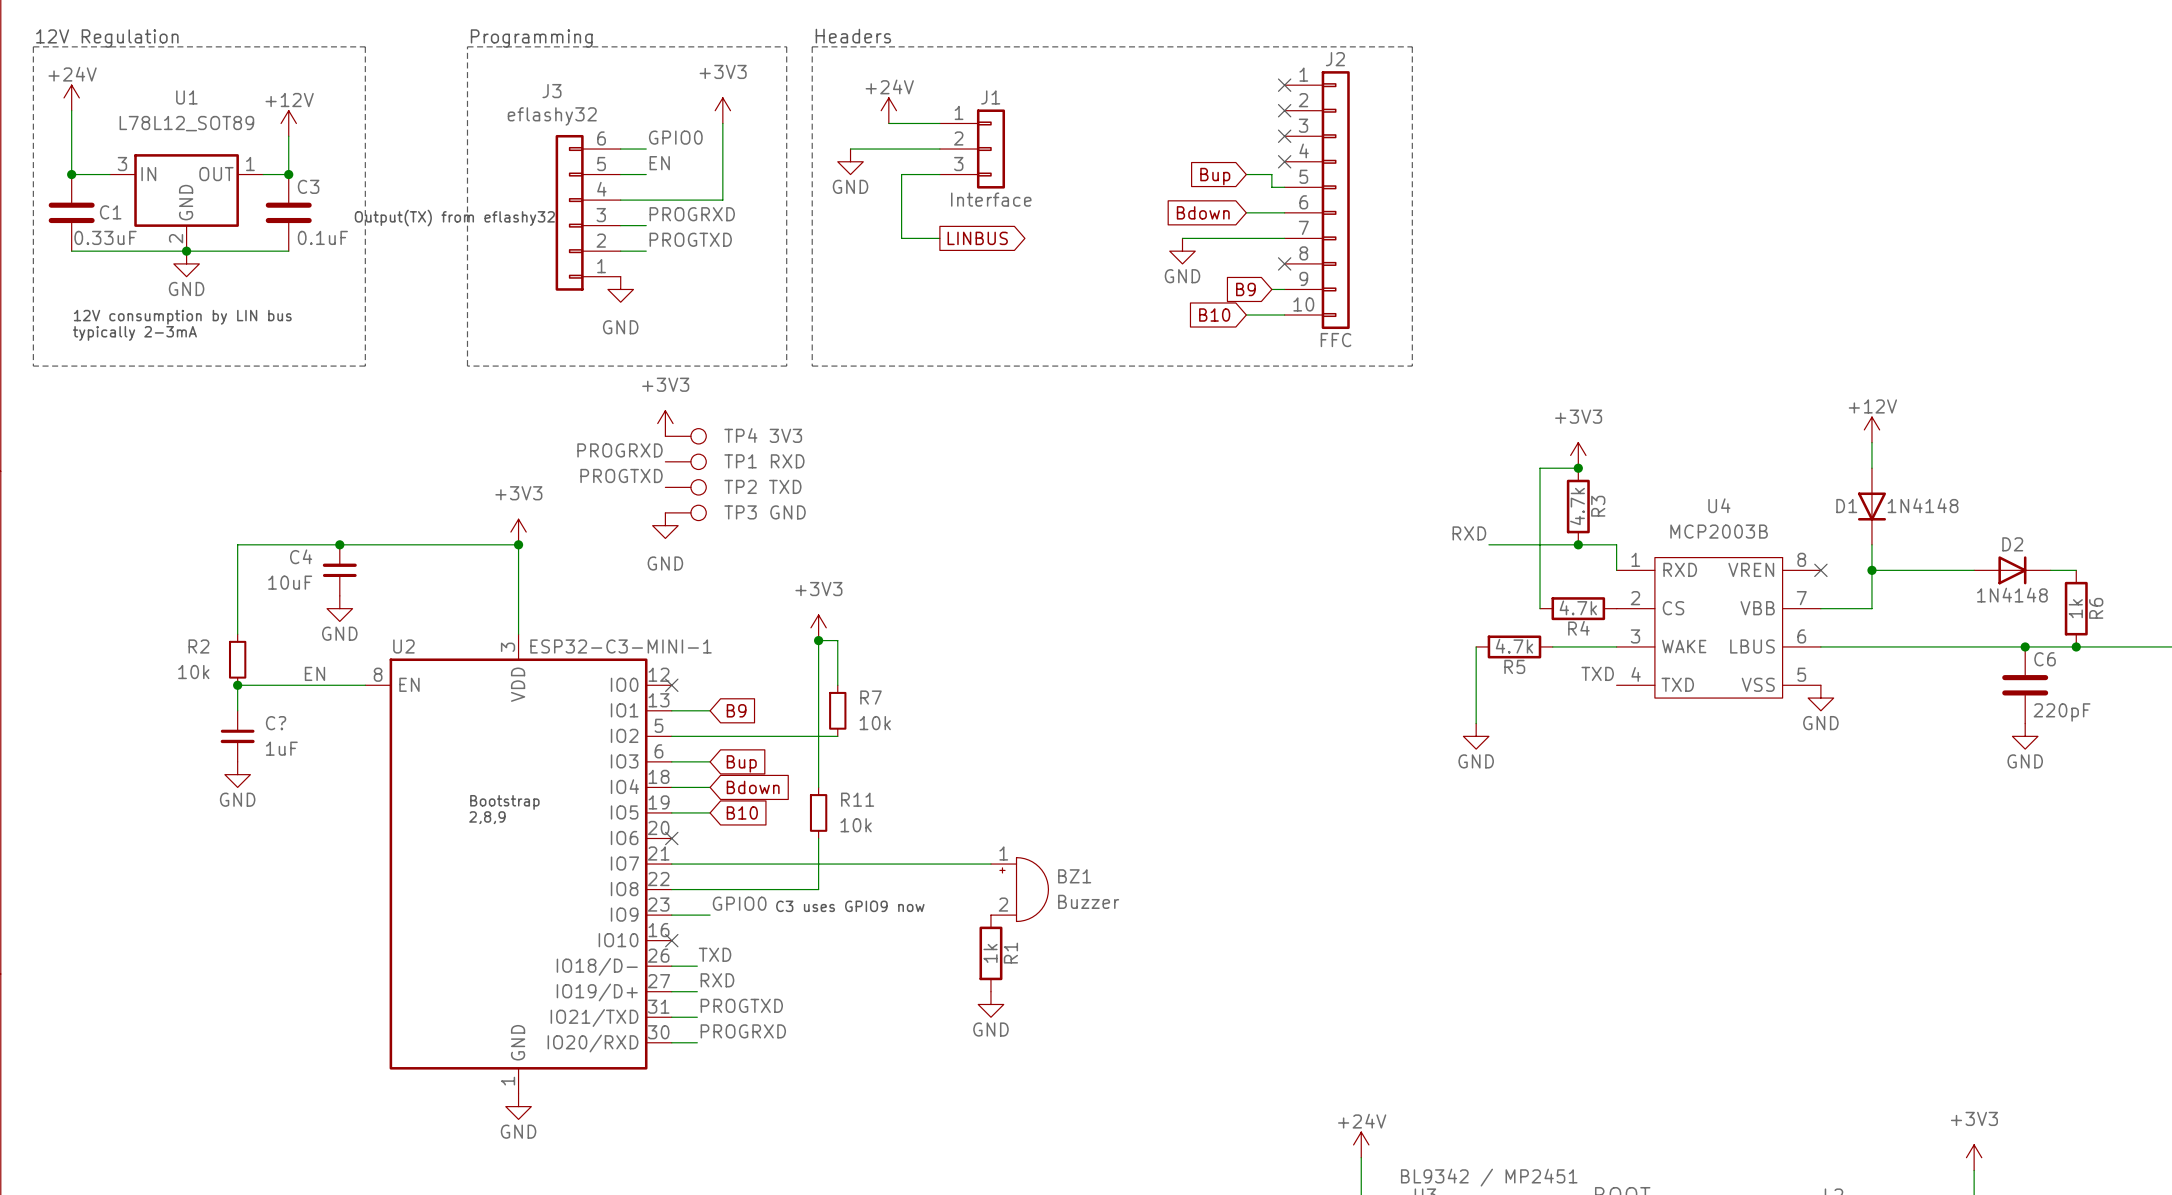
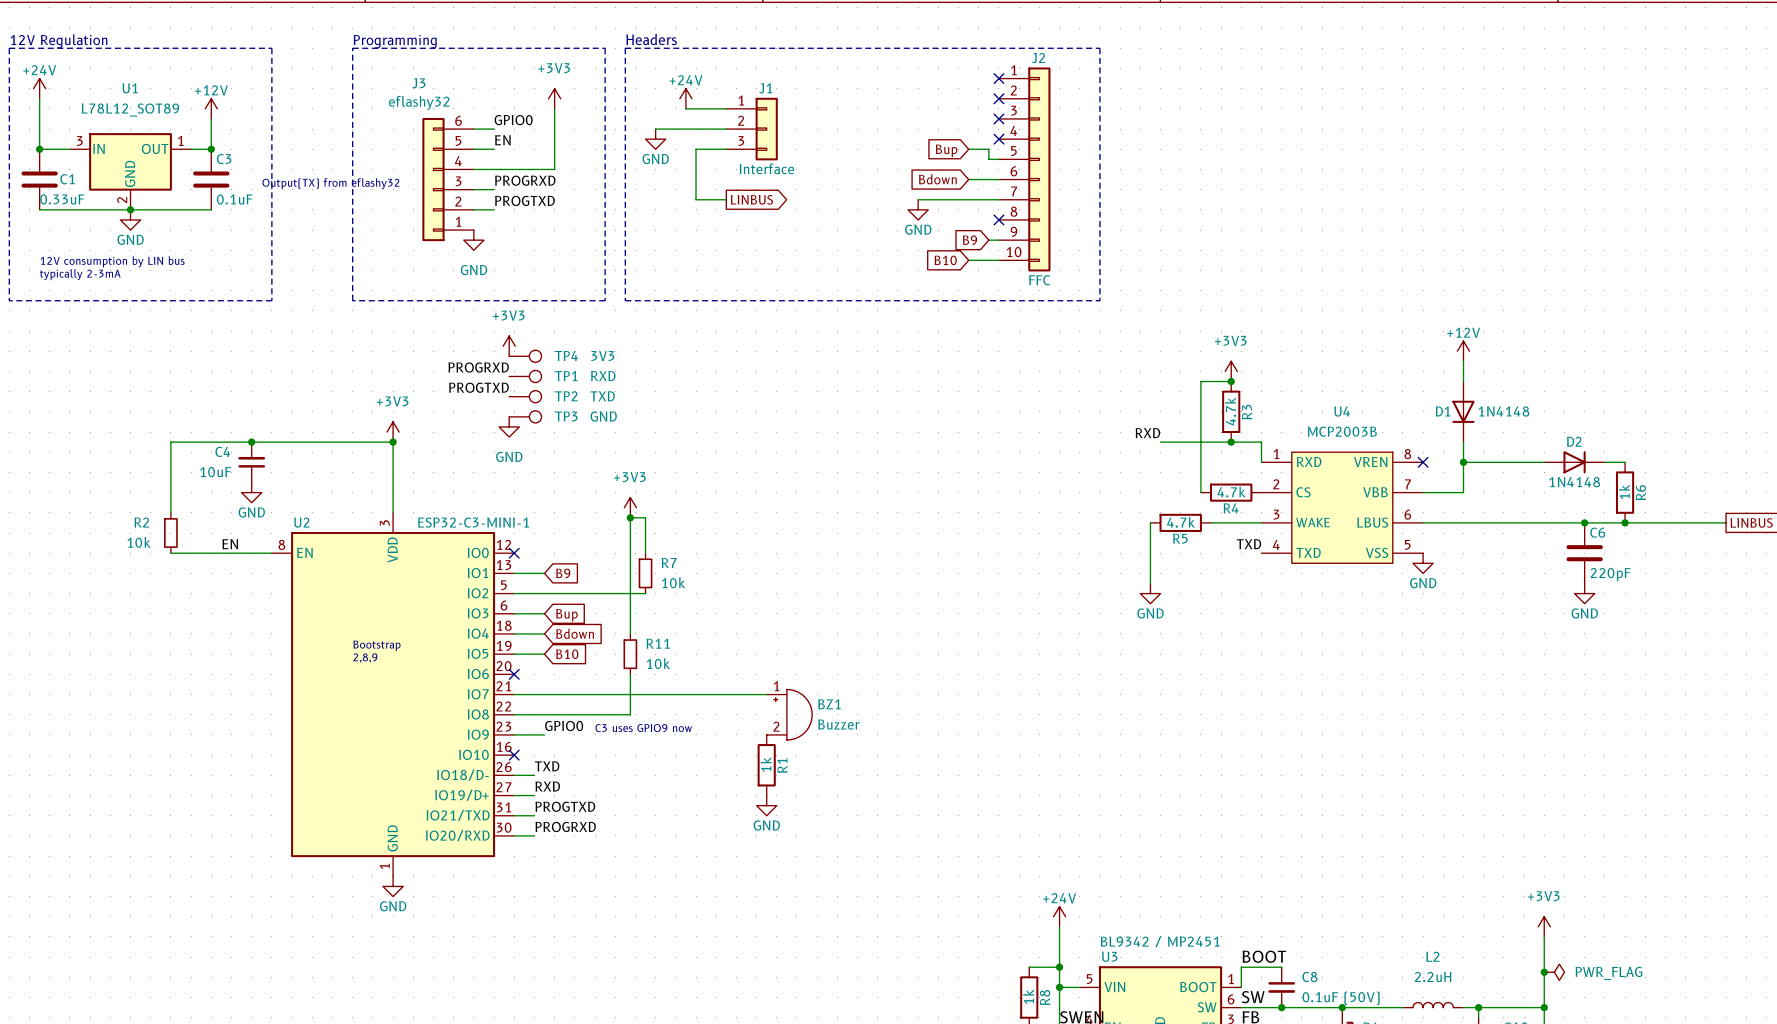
wire: (237, 685) (237, 710) -> none
junction: (237, 685) -> none
C?: 1uF (237, 736) -> none
power symbol: GND (237, 774) -> none

